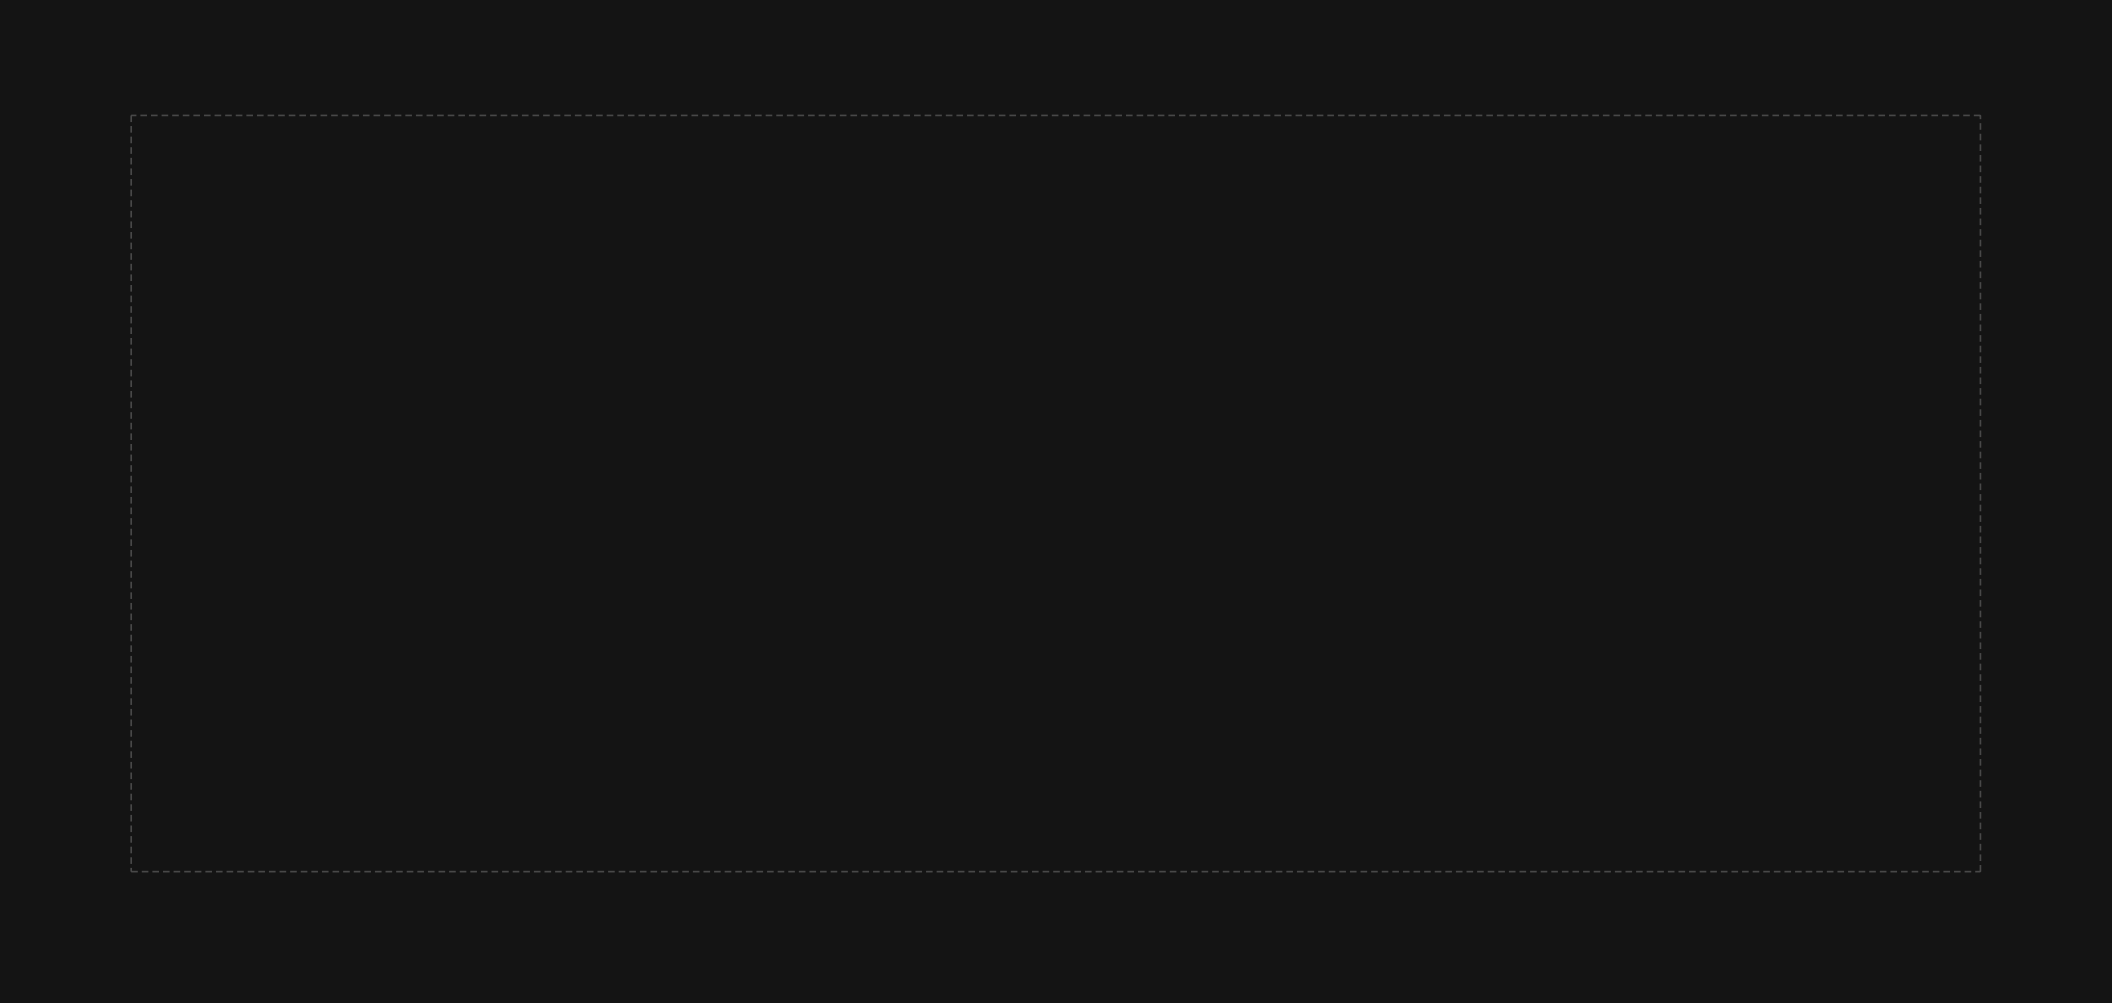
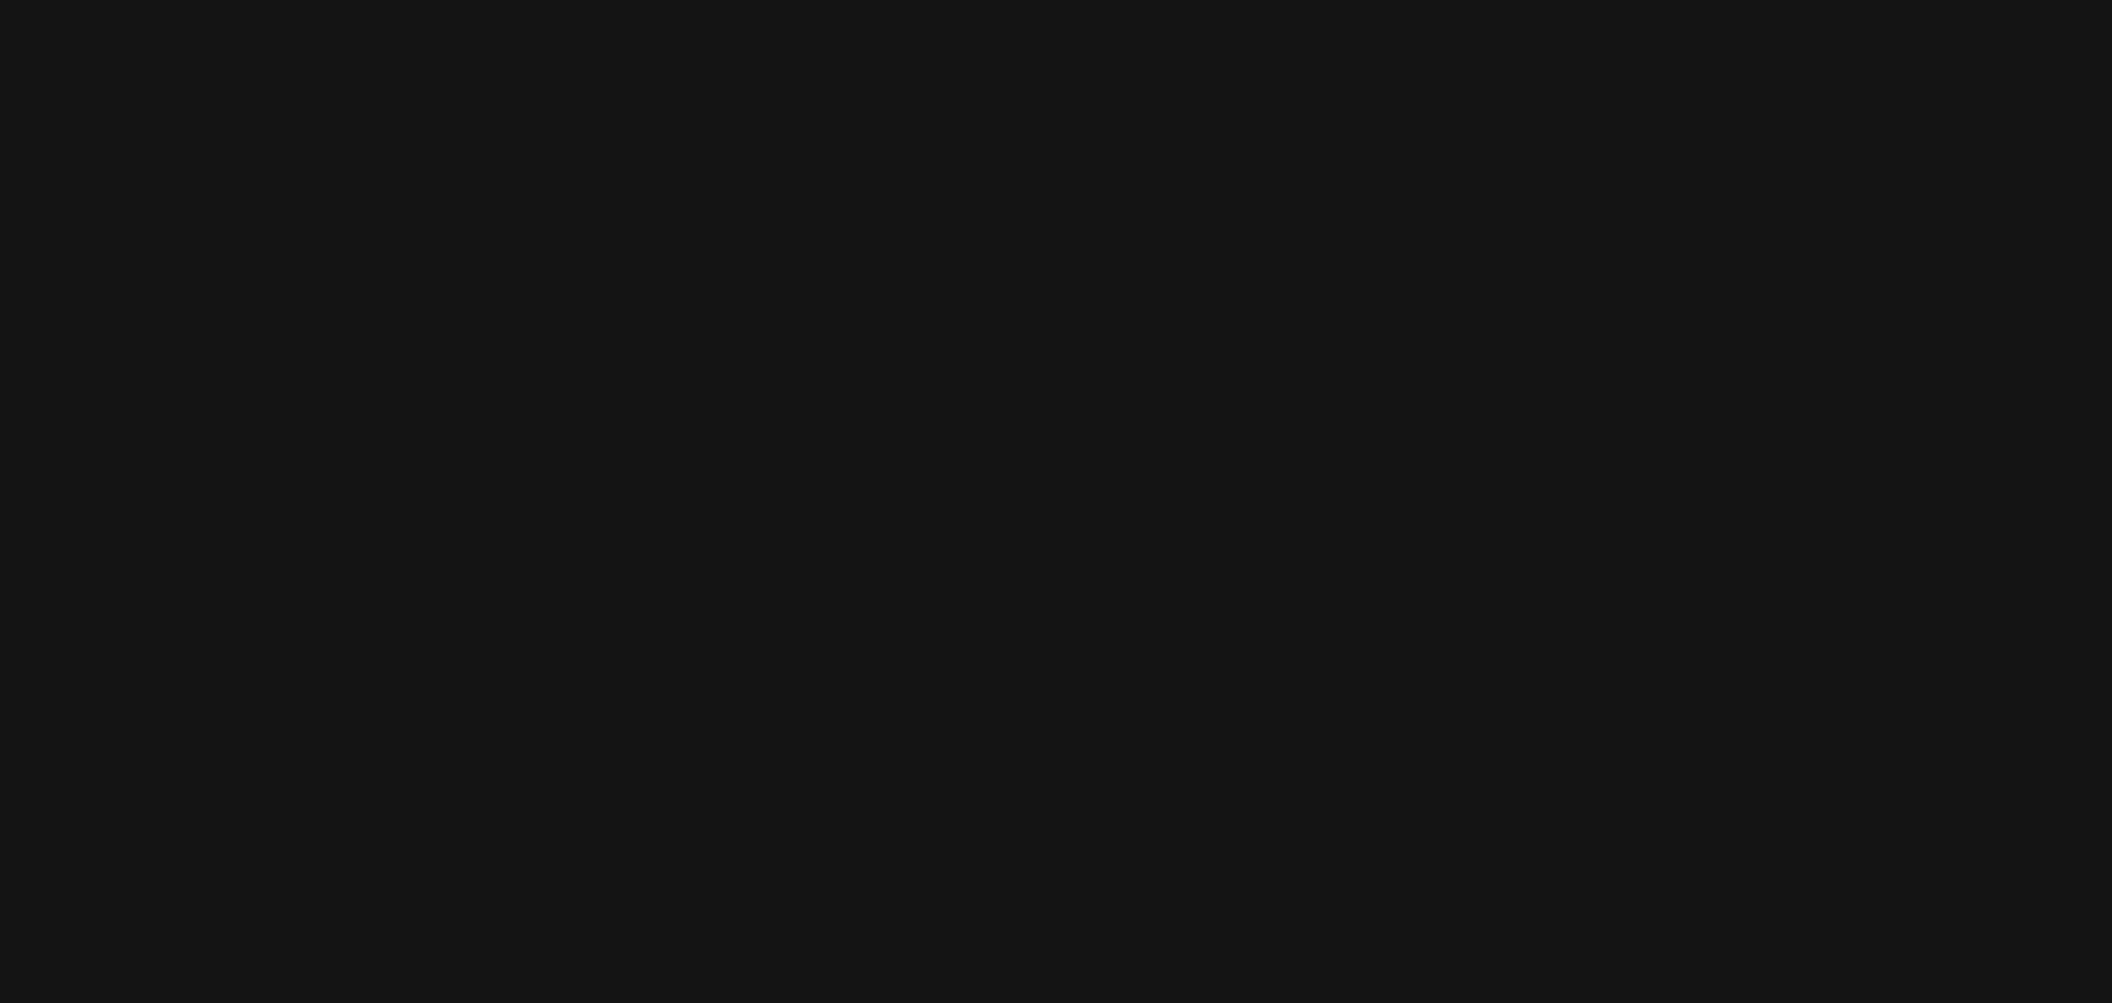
zone outline: (1980, 115) (1980, 871) (131, 871) (131, 115) (1980, 115) -> none

